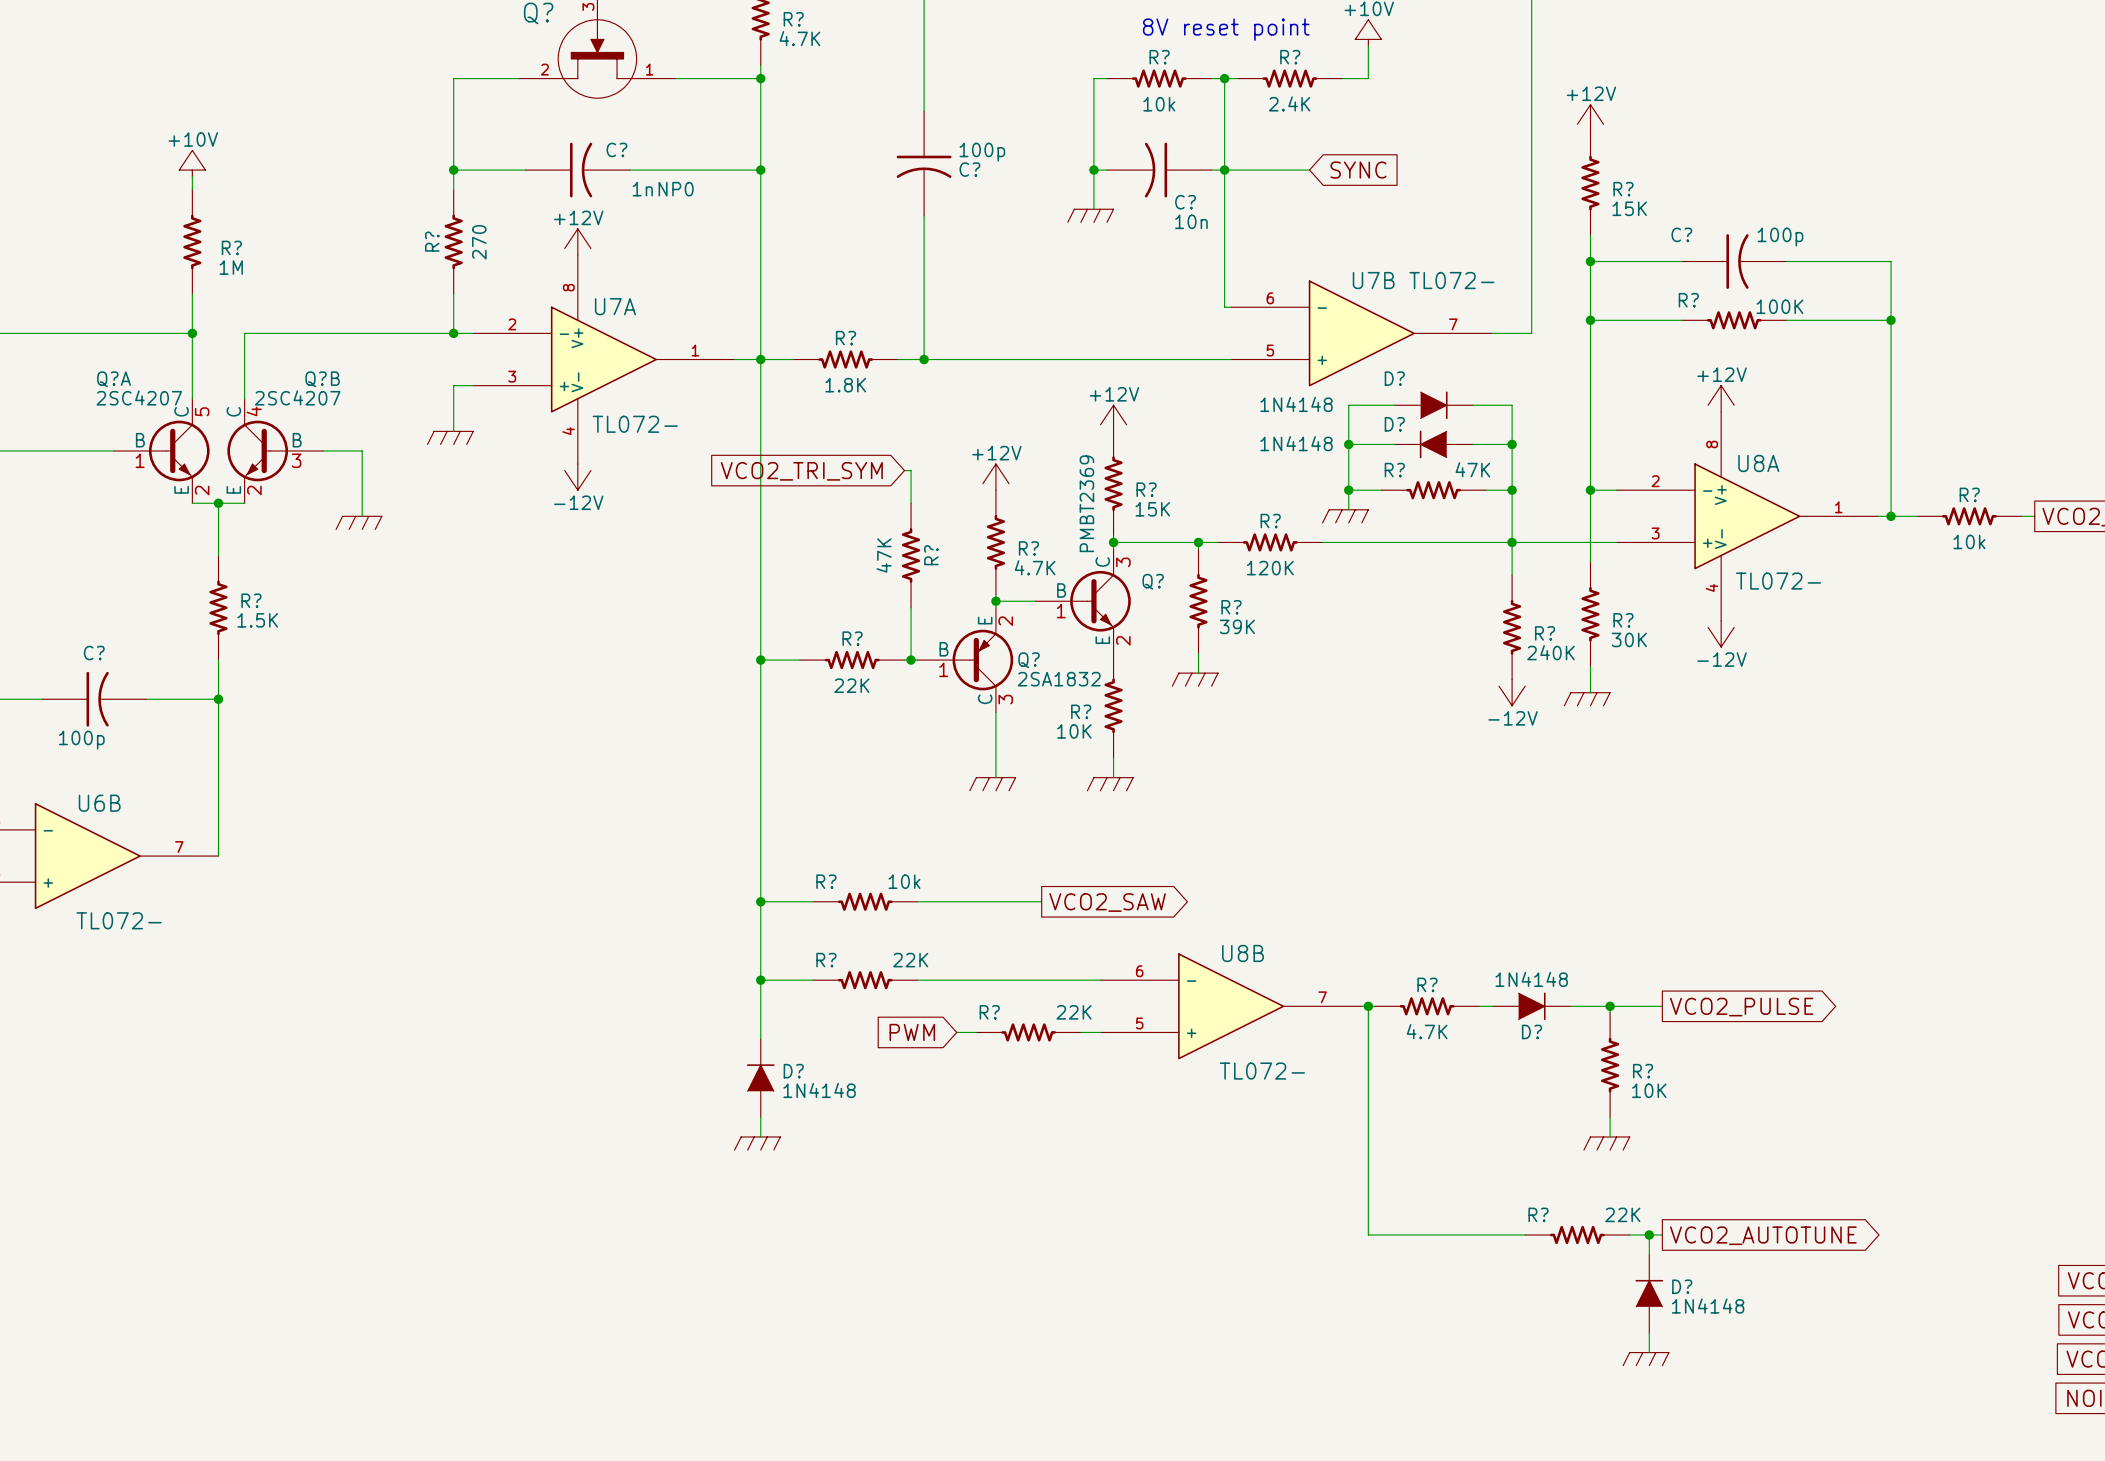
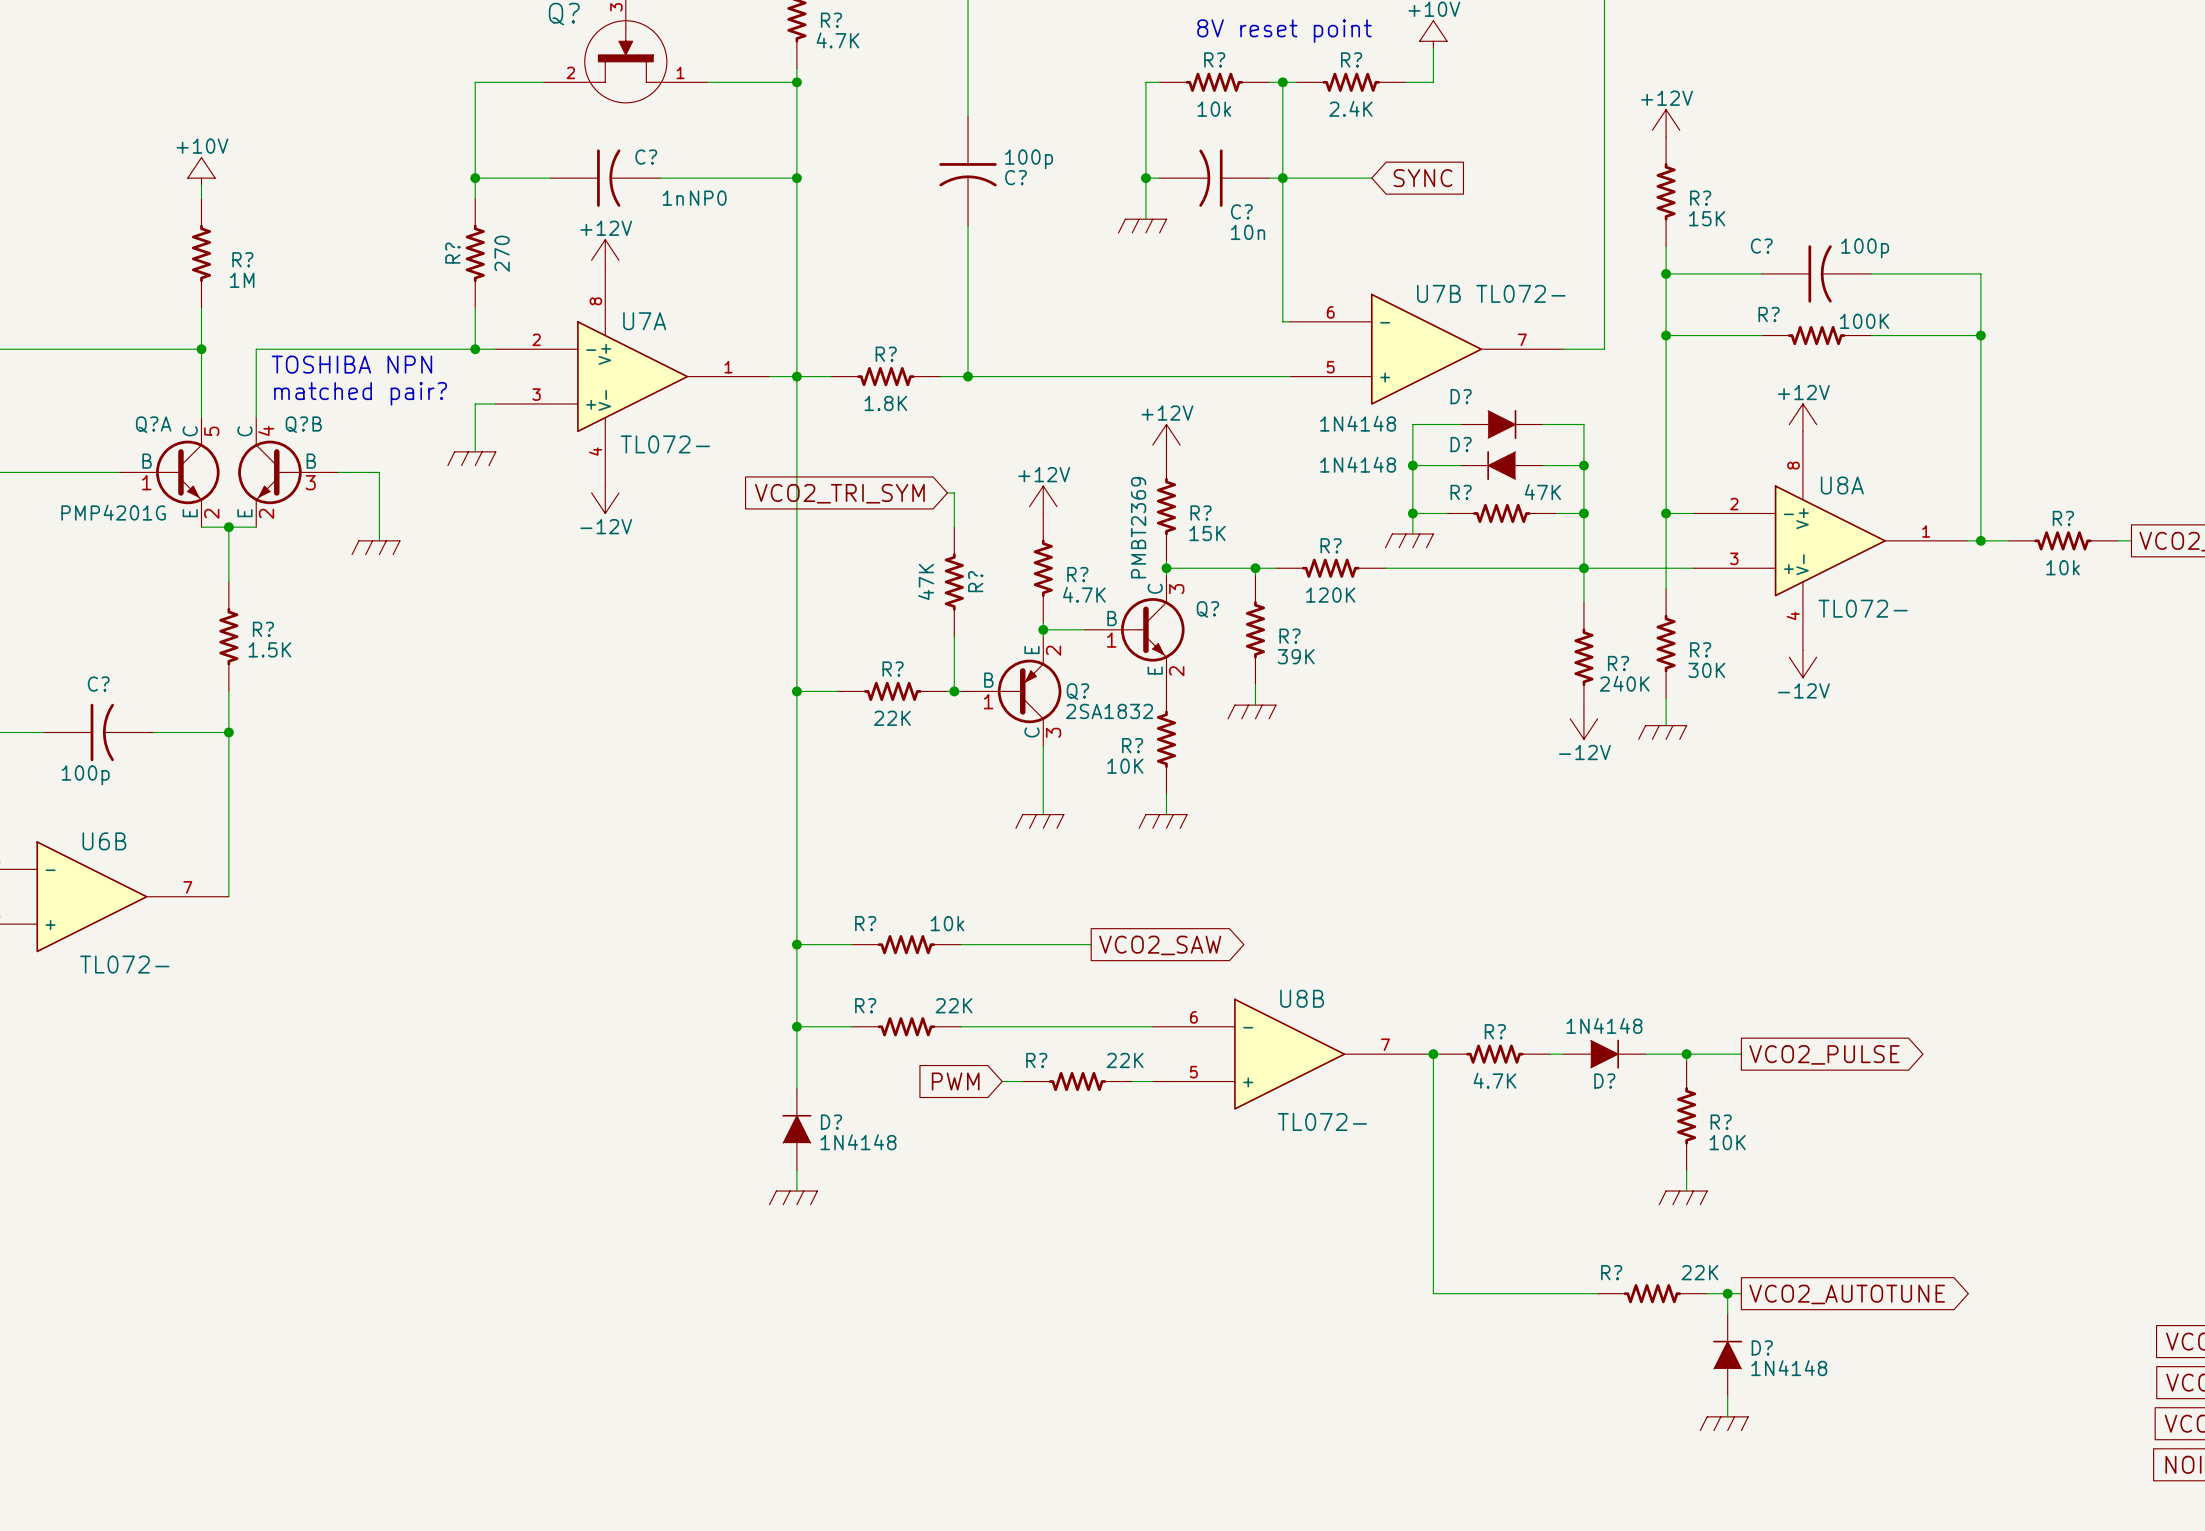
text: none -> TOSHIBA NPN (351, 364)
text: none -> matched pair? (360, 393)
Q?A name position: Q?A (114, 379) -> Q?A (153, 424)
Q?B name position: Q?B (322, 379) -> Q?B (303, 424)
Q?A value: 2SC4207 (139, 397) -> PMP4201G (113, 512)
Q?B value: 2SC4207 (297, 397) -> none

